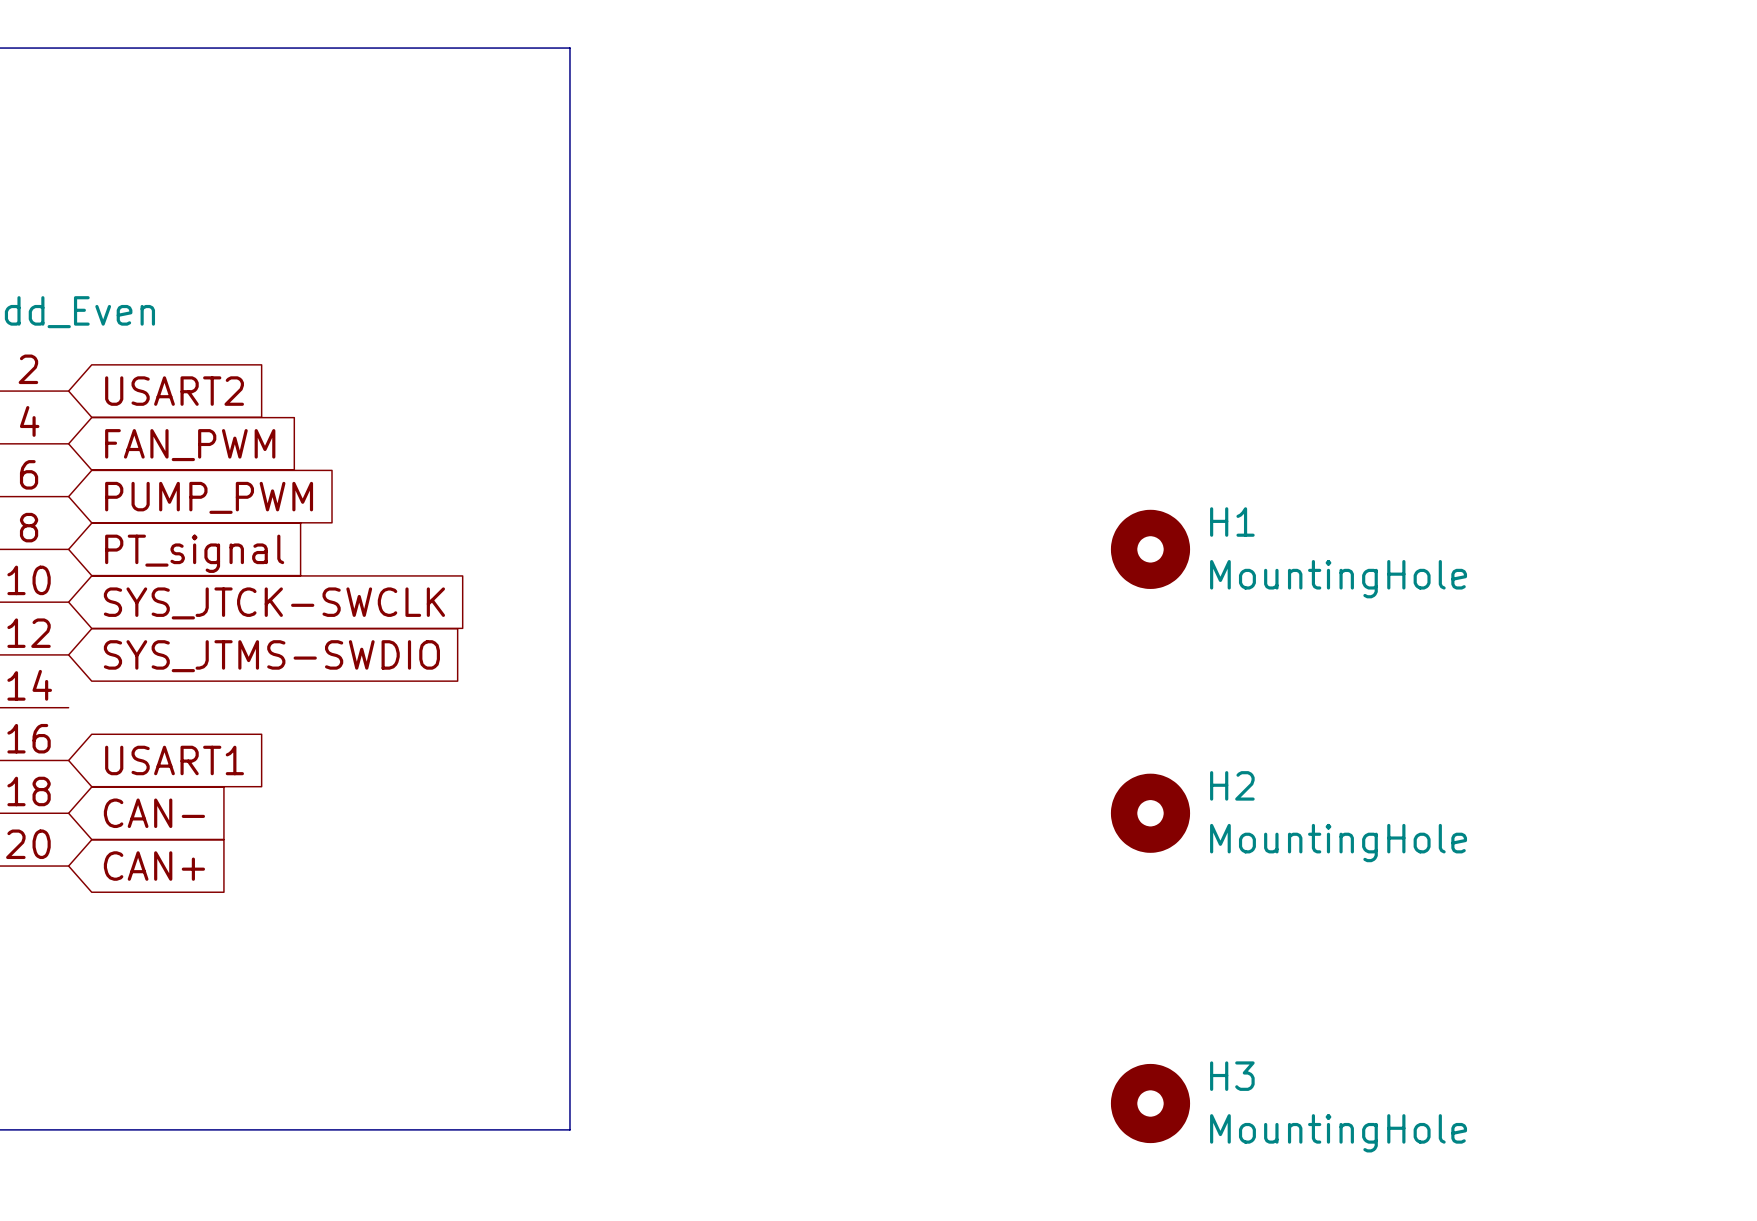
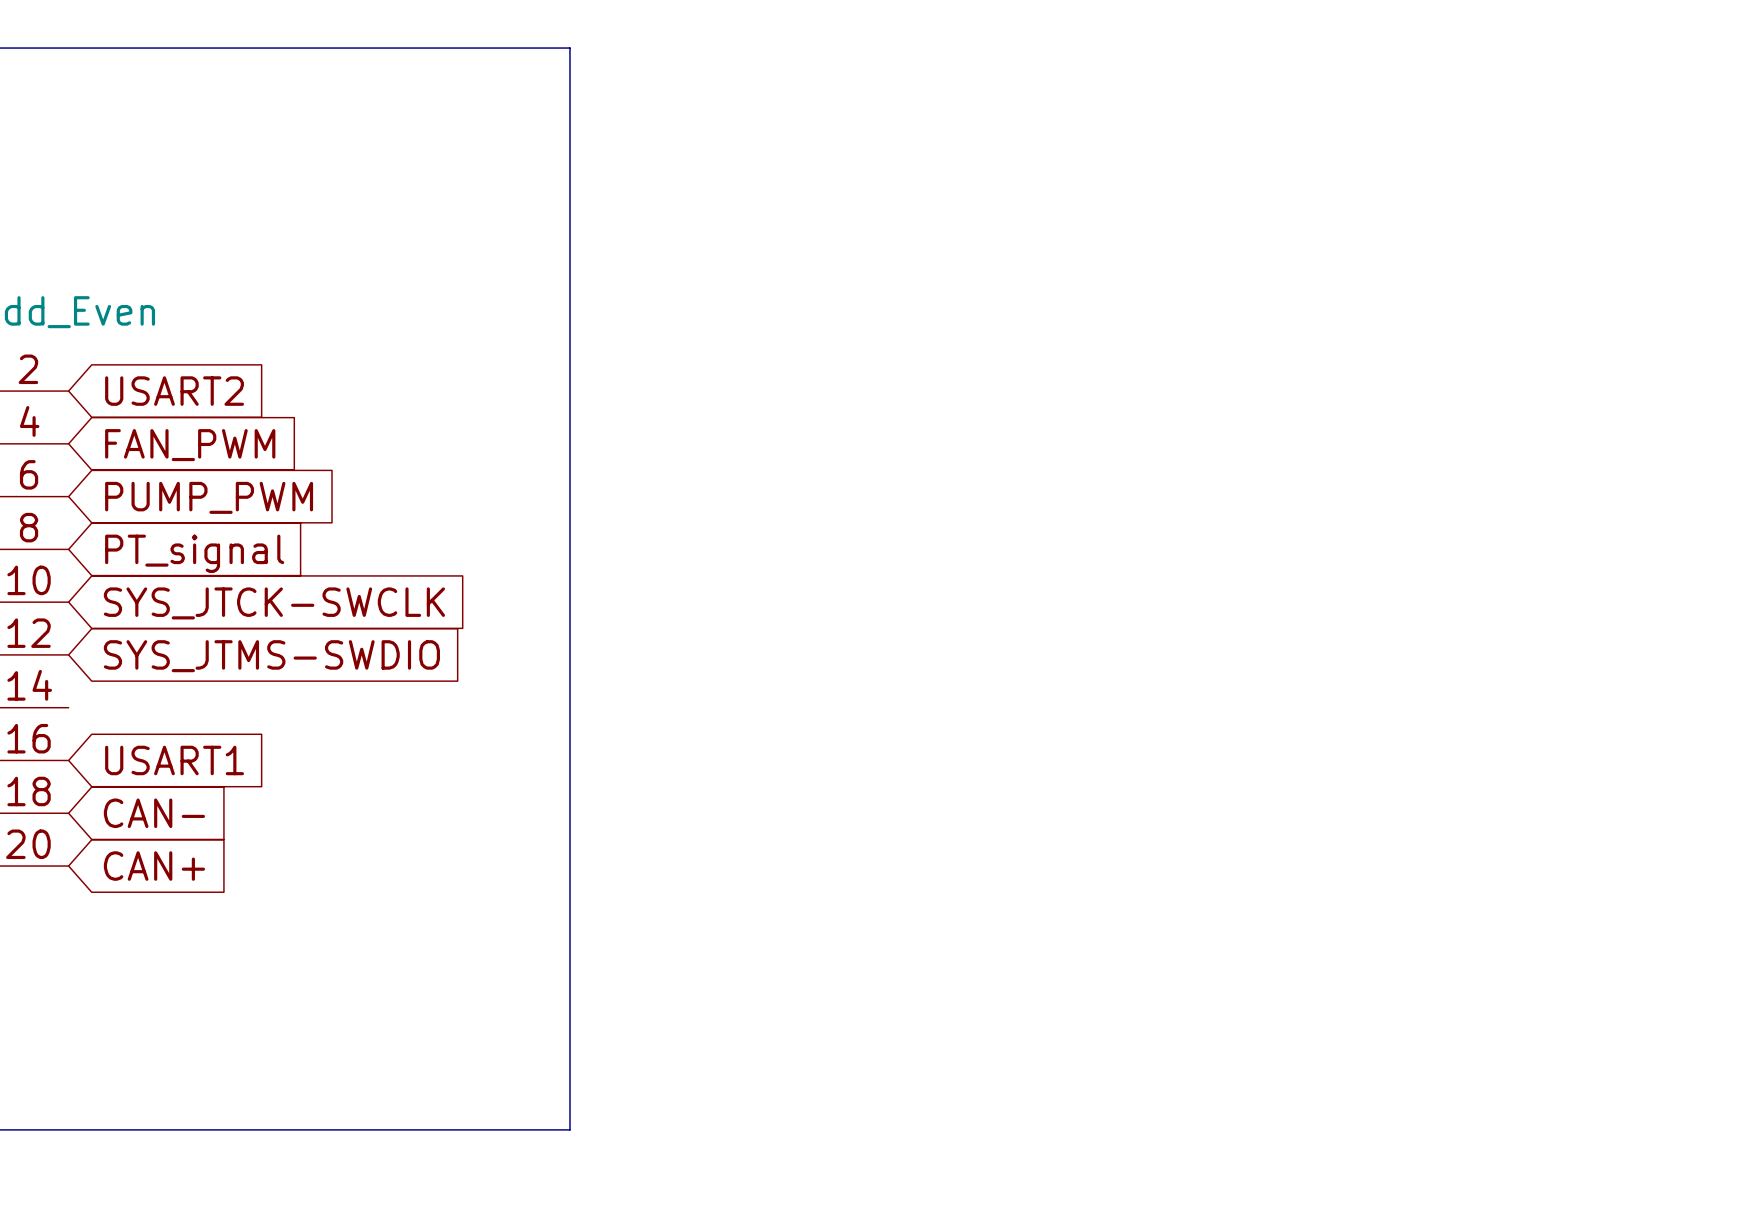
H1: MountingHole (1150, 549) -> none
H2: MountingHole (1150, 813) -> none
H3: MountingHole (1150, 1103) -> none

